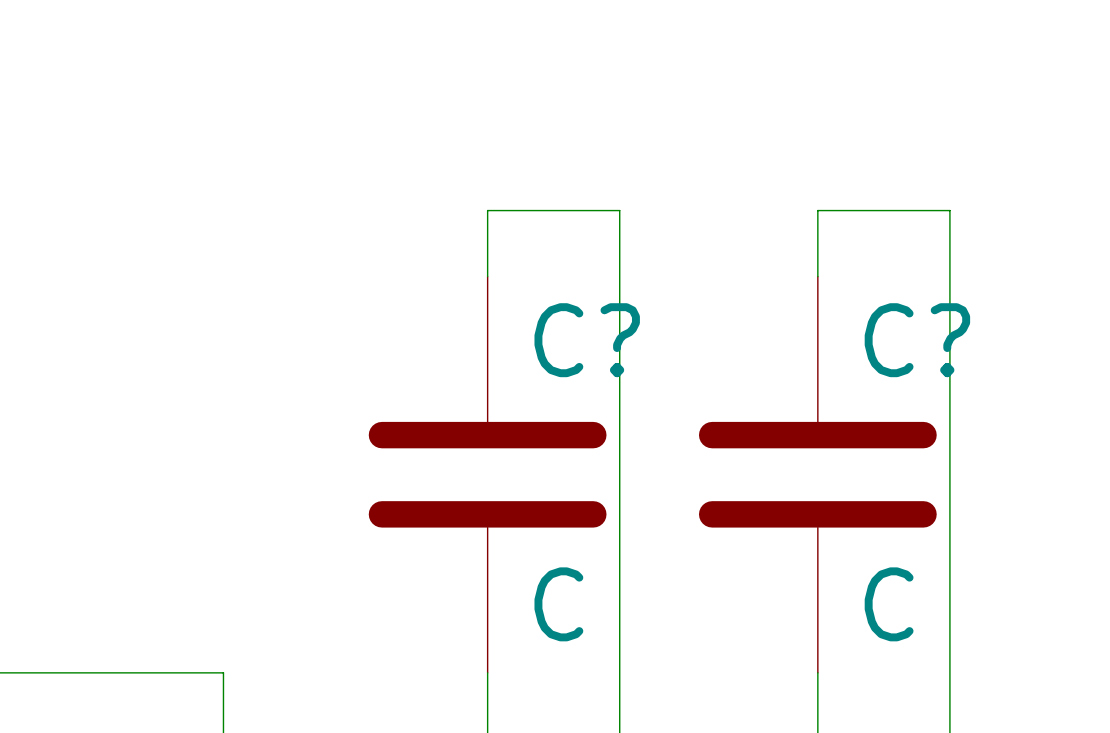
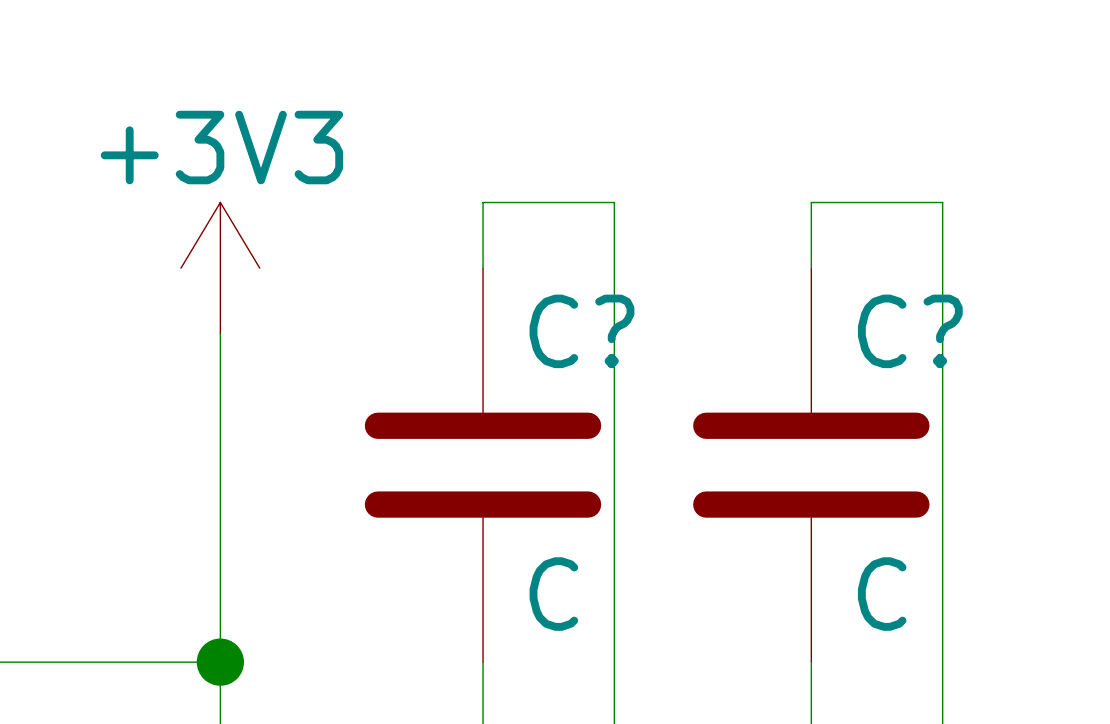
power symbol: none -> +3V3 (220, 268)
wire: none -> (220, 333) (220, 662)
junction: none -> (220, 662)

